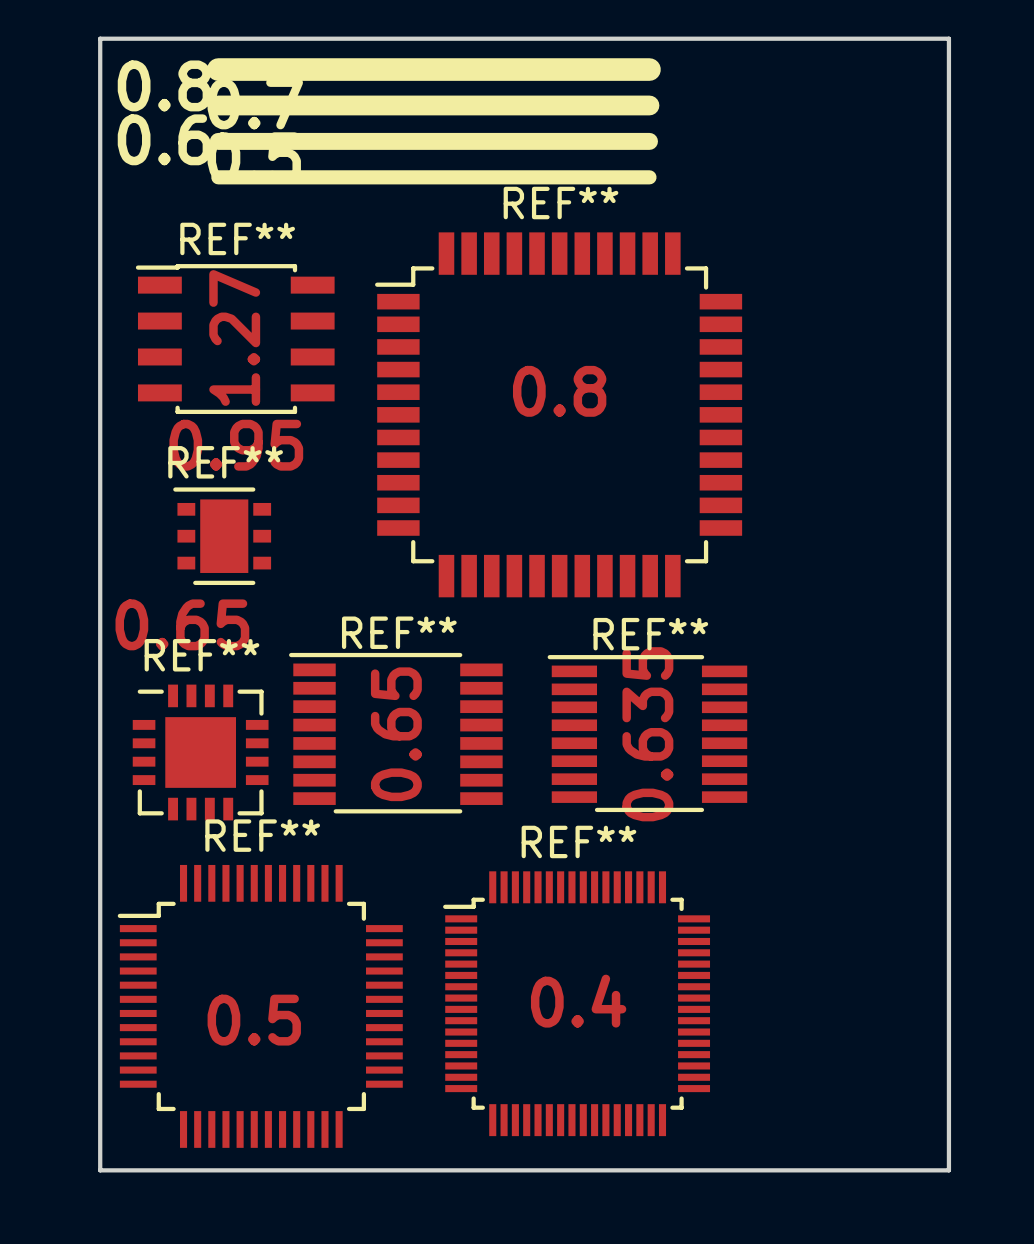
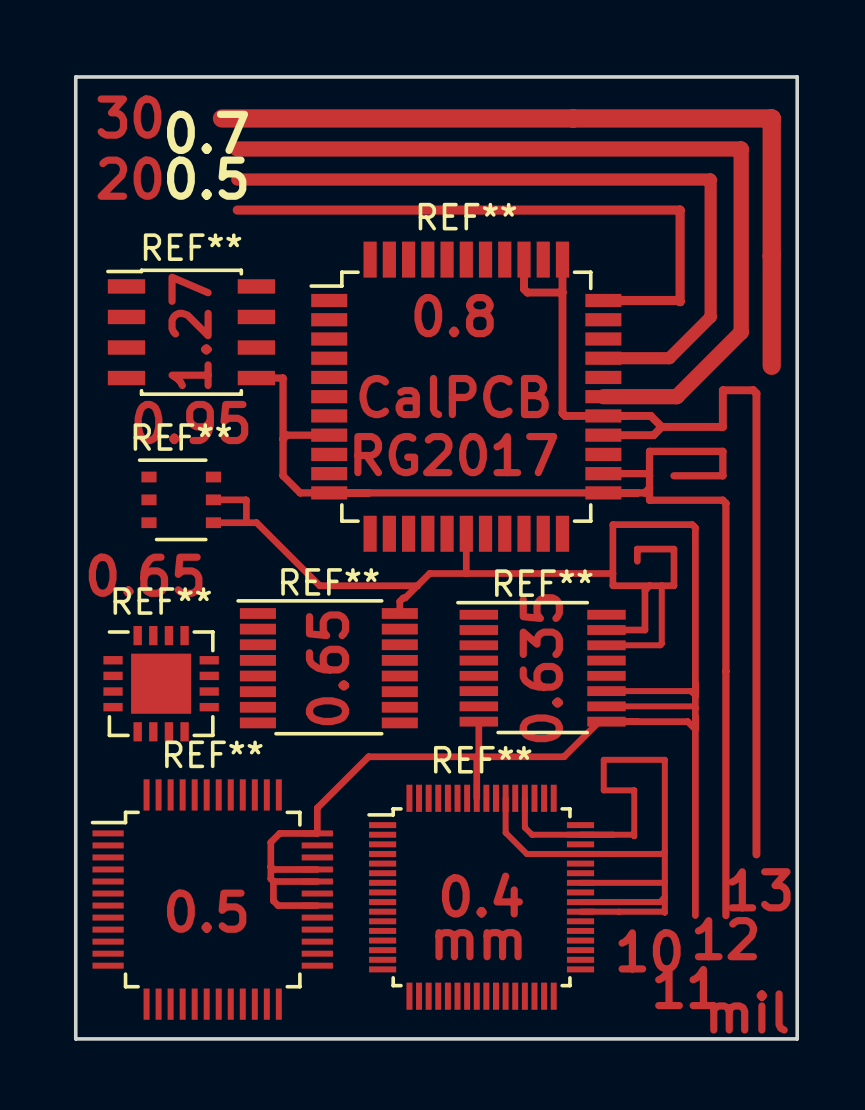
line: (218, 69) (649, 69) -> none
text: 0.8 (164, 85) -> 30 (129, 117)
top track: none -> (221, 118) (771, 118) (771, 365)
line: (218, 105) (649, 105) -> none
top track: none -> (237, 148) (741, 148) (741, 332) (676, 396) (603, 396)
text: 0.6 (164, 139) -> 20 (129, 178)
line: (218, 141) (649, 141) -> none
top track: none -> (237, 179) (710, 179) (710, 316) (669, 358) (603, 358)
line: (218, 177) (649, 177) -> none
top track: none -> (237, 210) (680, 210) (680, 301) (603, 300)
top track: none -> (524, 259) (524, 289) (527, 292) (562, 292)
top track: none -> (562, 259) (562, 413) (565, 415) (650, 415) (661, 426)
text position: 0.8 (559, 391) -> 0.8 (454, 315)
top track: none -> (256, 378) (283, 378) (283, 475) (300, 492) (644, 492) (649, 488)
text: none -> CalPCB (454, 396)
top track: none -> (661, 426) (722, 426) (722, 390) (753, 390) (756, 393) (756, 854)
top track: none -> (661, 426) (653, 435) (603, 435)
top track: none -> (329, 435) (287, 435) (283, 439)
text: none -> RG2017 (455, 454)
REF** footprint: [173, 487, 272, 586] -> [137, 458, 222, 542]
top track: none -> (603, 473) (647, 473) (649, 475)
top track: none -> (673, 475) (722, 475) (722, 451) (649, 451) (649, 500) (722, 500) (725, 503) (725, 915)
top track: none -> (213, 499) (246, 499) (246, 522)
top track: none -> (213, 522) (256, 522) (319, 585) (417, 585)
top track: none -> (466, 533) (466, 573)
top track: none -> (637, 561) (637, 549) (673, 549) (673, 585) (612, 585) (612, 524) (692, 524) (695, 527) (695, 915)
top track: none -> (612, 573) (429, 573) (399, 601) (399, 613)
top track: none -> (649, 585) (644, 590) (644, 630) (606, 630)
top track: none -> (661, 585) (661, 643) (606, 645)
top track: none -> (606, 691) (690, 691) (695, 695)
top track: none -> (606, 706) (693, 706) (695, 707)
top track: none -> (478, 721) (476, 798)
top track: none -> (695, 729) (687, 721) (599, 721) (564, 756) (368, 756) (317, 808) (317, 833) (279, 833) (270, 842) (270, 878) (273, 881)
top track: none -> (505, 798) (505, 832) (526, 853) (662, 853) (664, 851)
top track: none -> (524, 798) (524, 827) (532, 834) (634, 836) (634, 790) (603, 790) (603, 759) (664, 759) (664, 851)
top track: none -> (664, 851) (664, 912) (580, 911)
top track: none -> (270, 866) (273, 869) (317, 869)
top track: none -> (273, 881) (273, 900) (278, 905) (317, 905)
top track: none -> (273, 881) (317, 881)
top track: none -> (664, 881) (580, 882)
text: none -> 13 (759, 889)
top track: none -> (664, 897) (660, 902) (580, 902)
text: none -> 12 (725, 938)
text: none -> mm (478, 944)
text: none -> 10 (649, 950)
text: none -> 11 (686, 987)
text: none -> mil (748, 1011)

